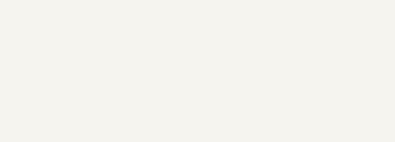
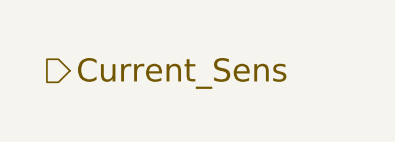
hierarchical label: none -> Current_Sens (182, 73)

